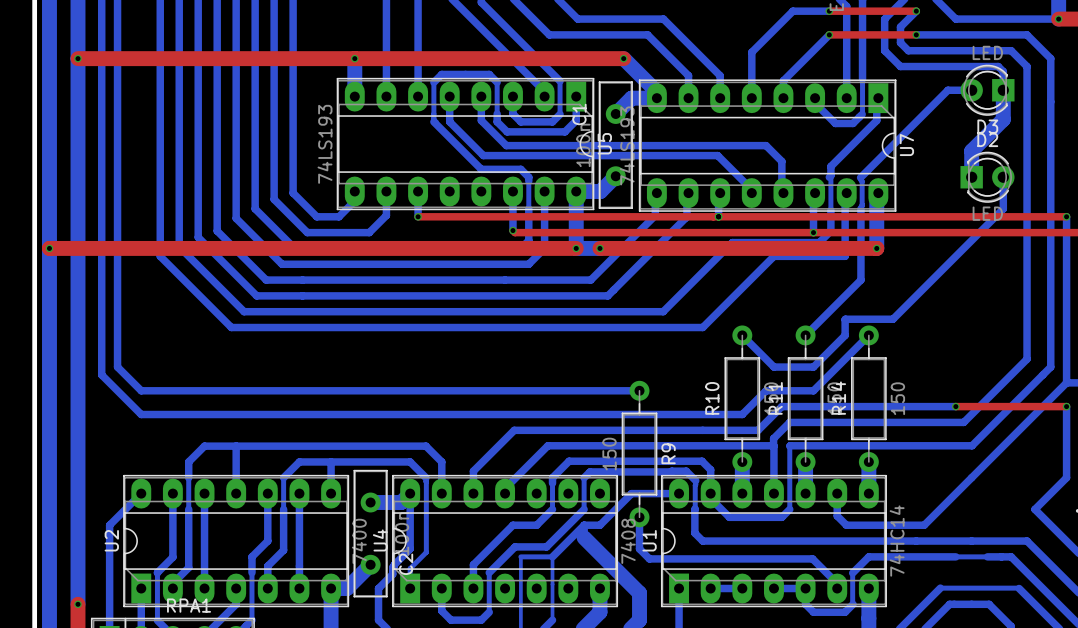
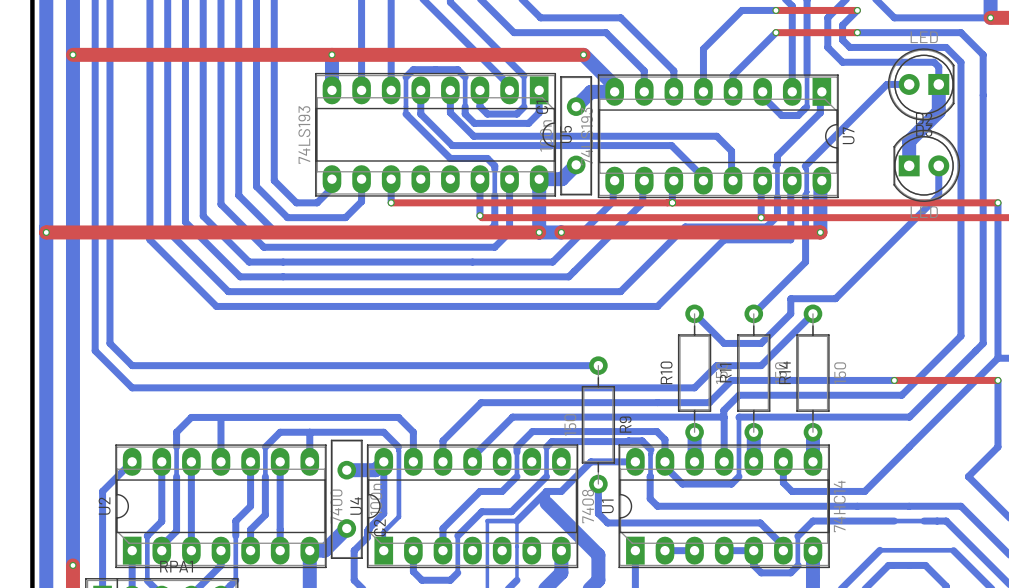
D3 footprint: [960, 64, 1015, 116] -> [887, 48, 955, 121]
D2 footprint: [960, 151, 1015, 203] -> [893, 129, 961, 202]

